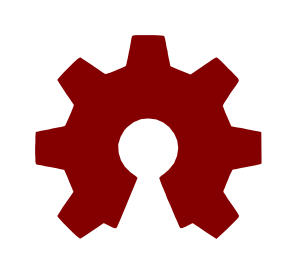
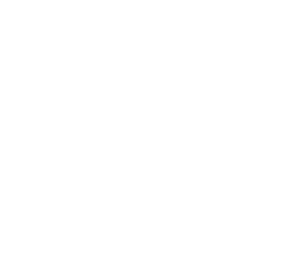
power symbol: (148, 136) -> none

